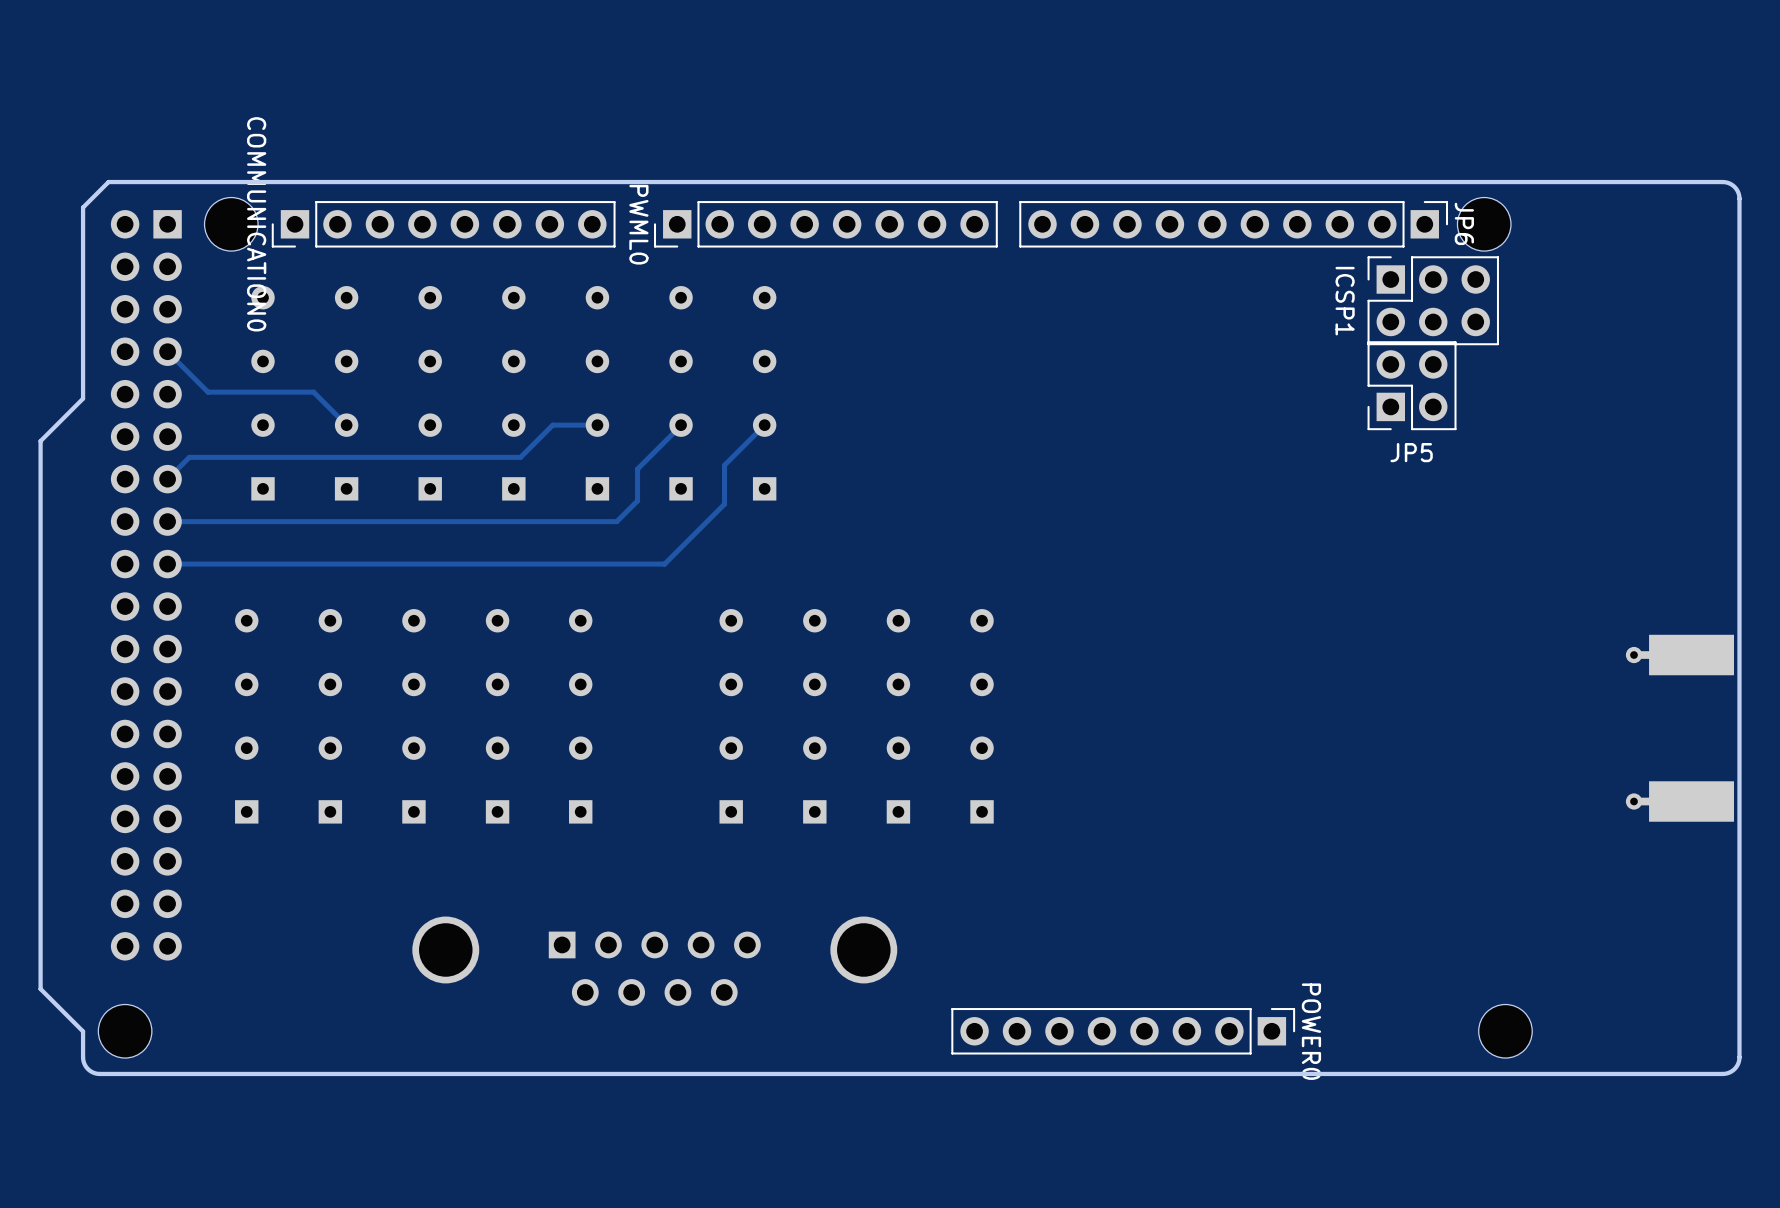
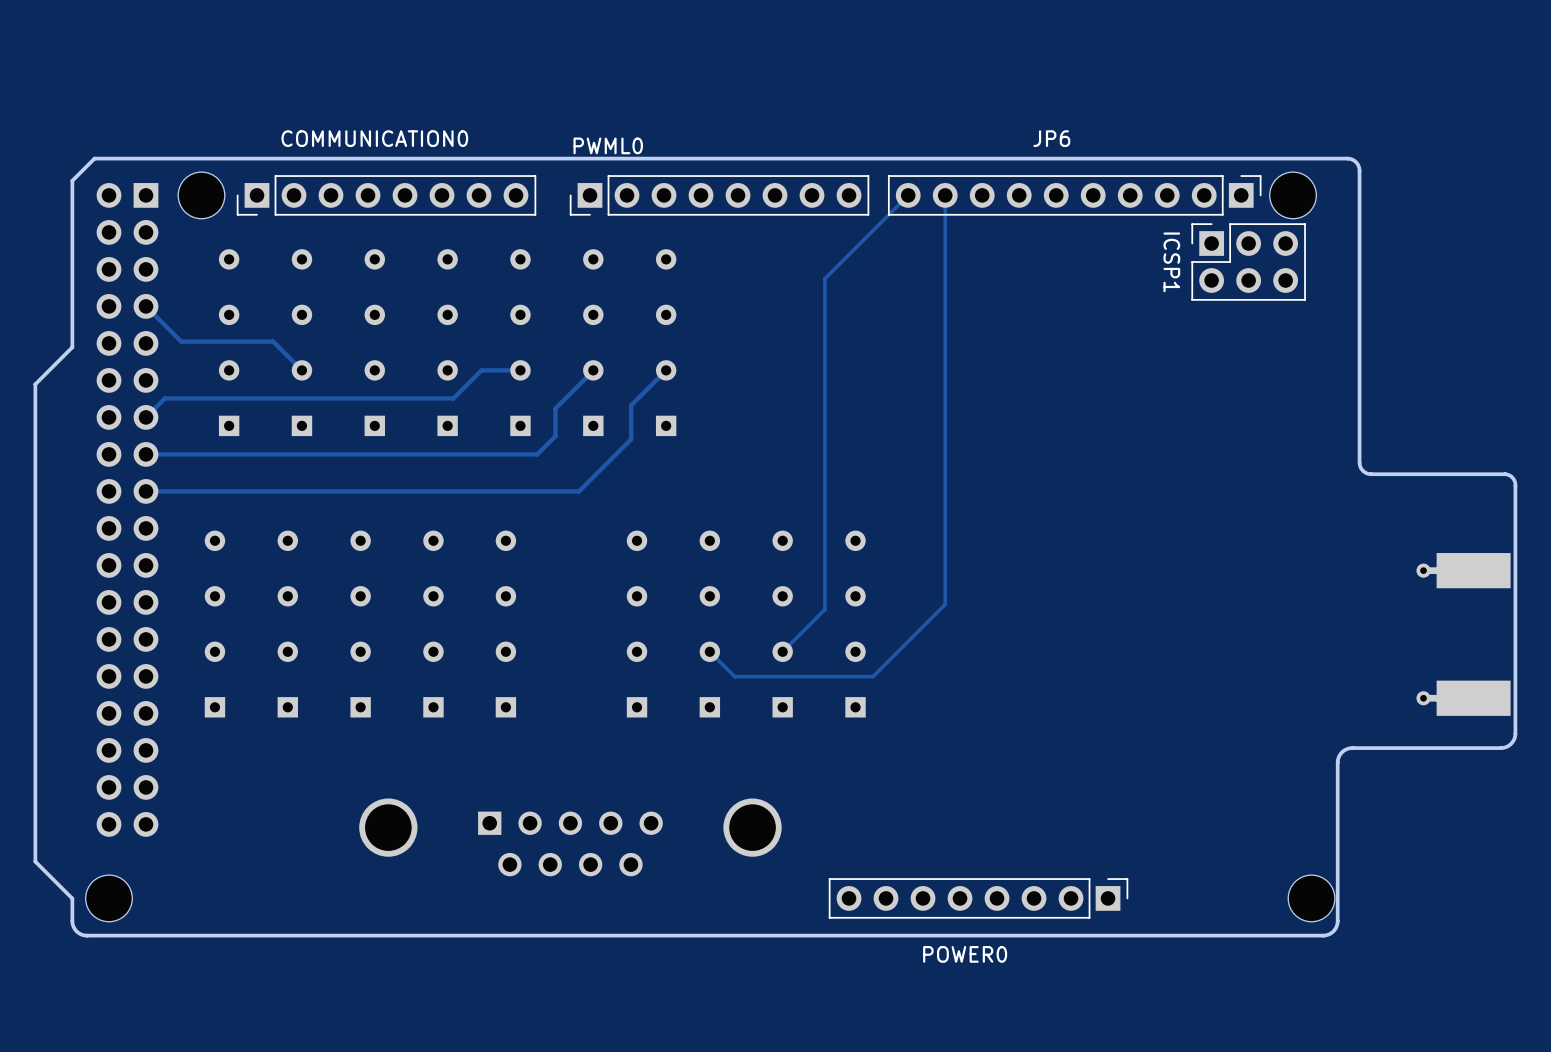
board edge: (1547, 182) (1722, 182) (1731, 184) (1737, 191) (1739, 198) (1739, 557) -> (1347, 158) (1355, 161) (1359, 169) (1359, 462) (1361, 468) (1365, 472) (1371, 474) (1505, 474) (1512, 477) (1515, 485)
JP6 name rotation: 0° (1464, 223) -> 90° counterclockwise (1051, 138)
JP6 name position: JP6 (1464, 223) -> JP6 (1051, 138)
COMMUNICATION0 name rotation: 0° (256, 224) -> 90° counterclockwise (374, 138)
PWML0 name rotation: 0° (638, 224) -> 90° counterclockwise (608, 145)
track: none -> (908, 195) (824, 278) (824, 609) (782, 651)
track: none -> (945, 195) (945, 604) (873, 676) (734, 676) (709, 651)
JP5: (1412, 385) -> none
board edge: (1739, 841) (1739, 1057) (1734, 1069) (1722, 1073) (1518, 1073) -> (1515, 733) (1512, 742) (1502, 747) (1352, 748) (1342, 752) (1337, 762) (1337, 922) (1333, 931) (1323, 935)
POWER0 name rotation: 0° (1311, 1031) -> 90° counterclockwise (965, 954)
POWER0 name position: POWER0 (1311, 1031) -> POWER0 (965, 954)

